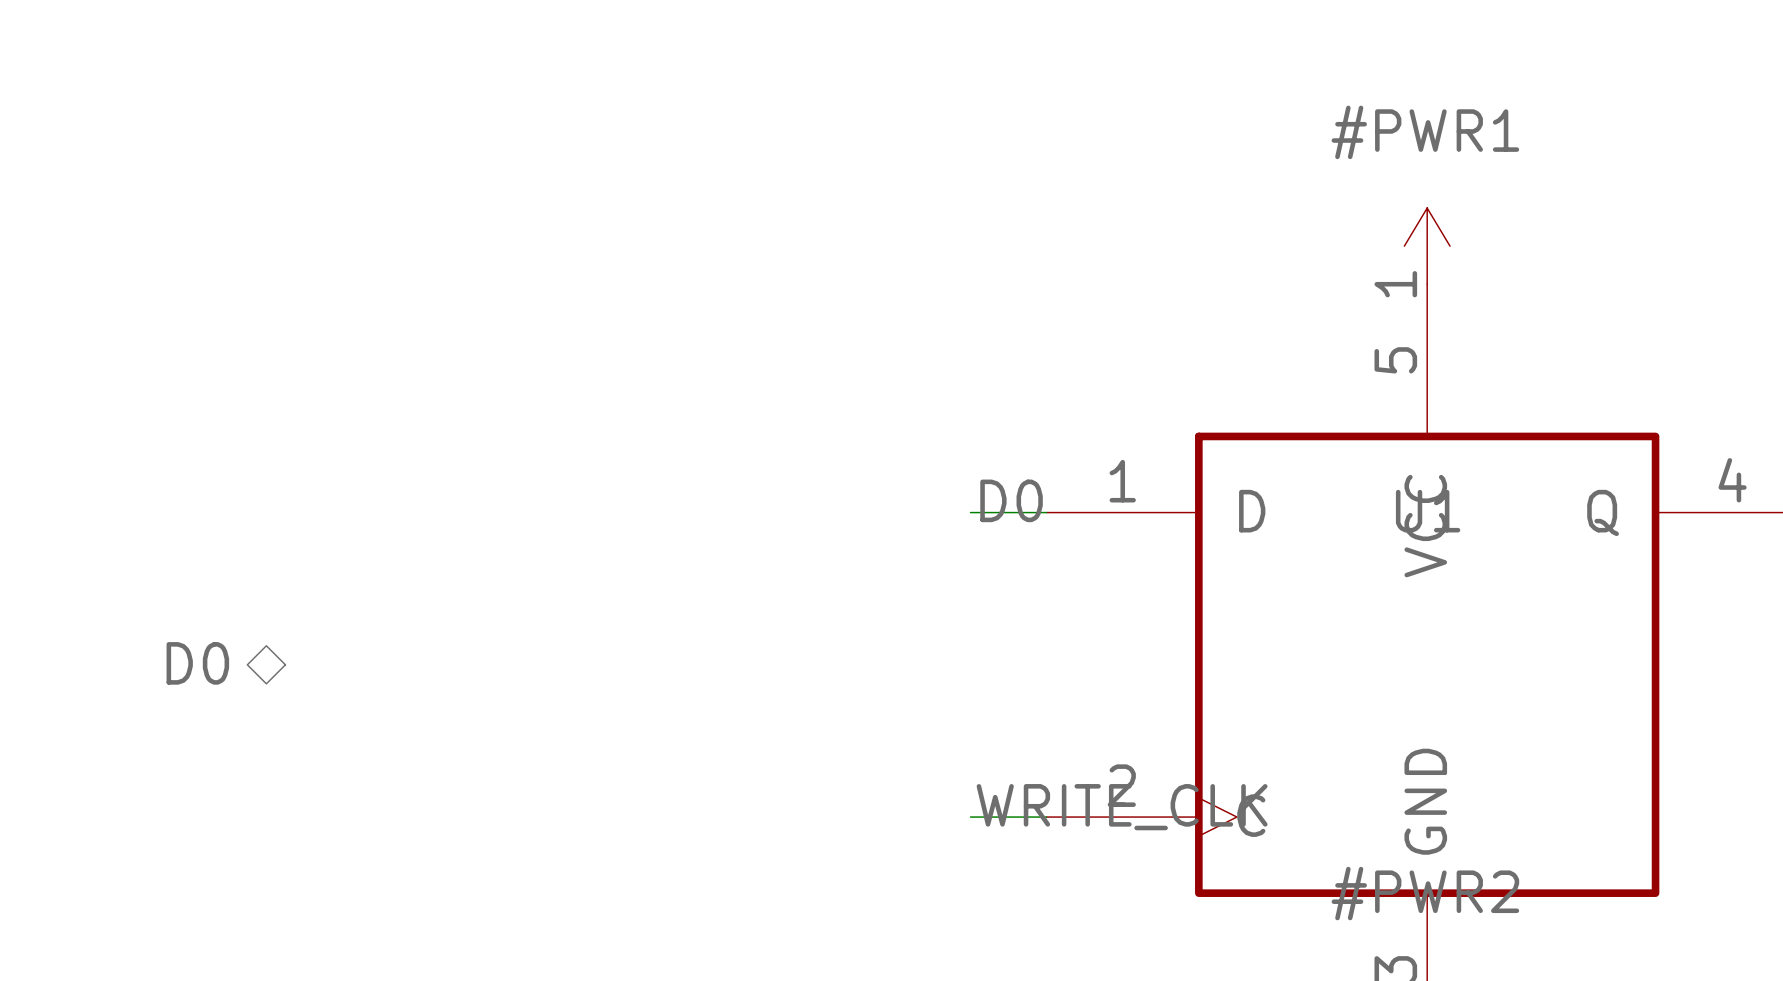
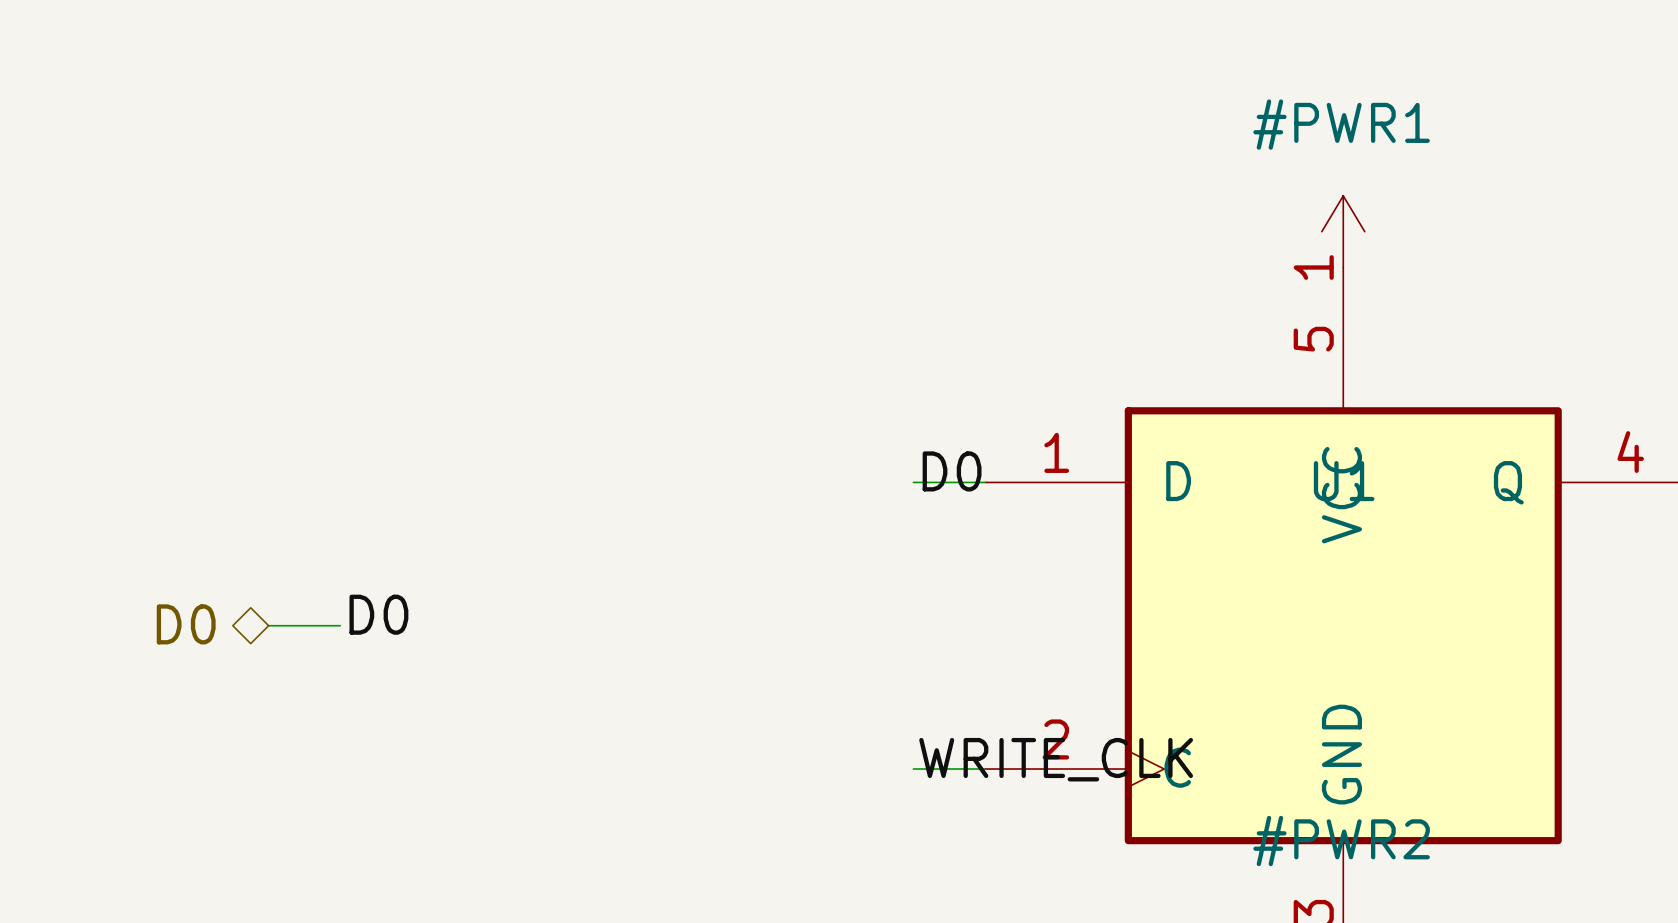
label: none -> D0 (378, 614)
wire: none -> (268, 625) (340, 625)

